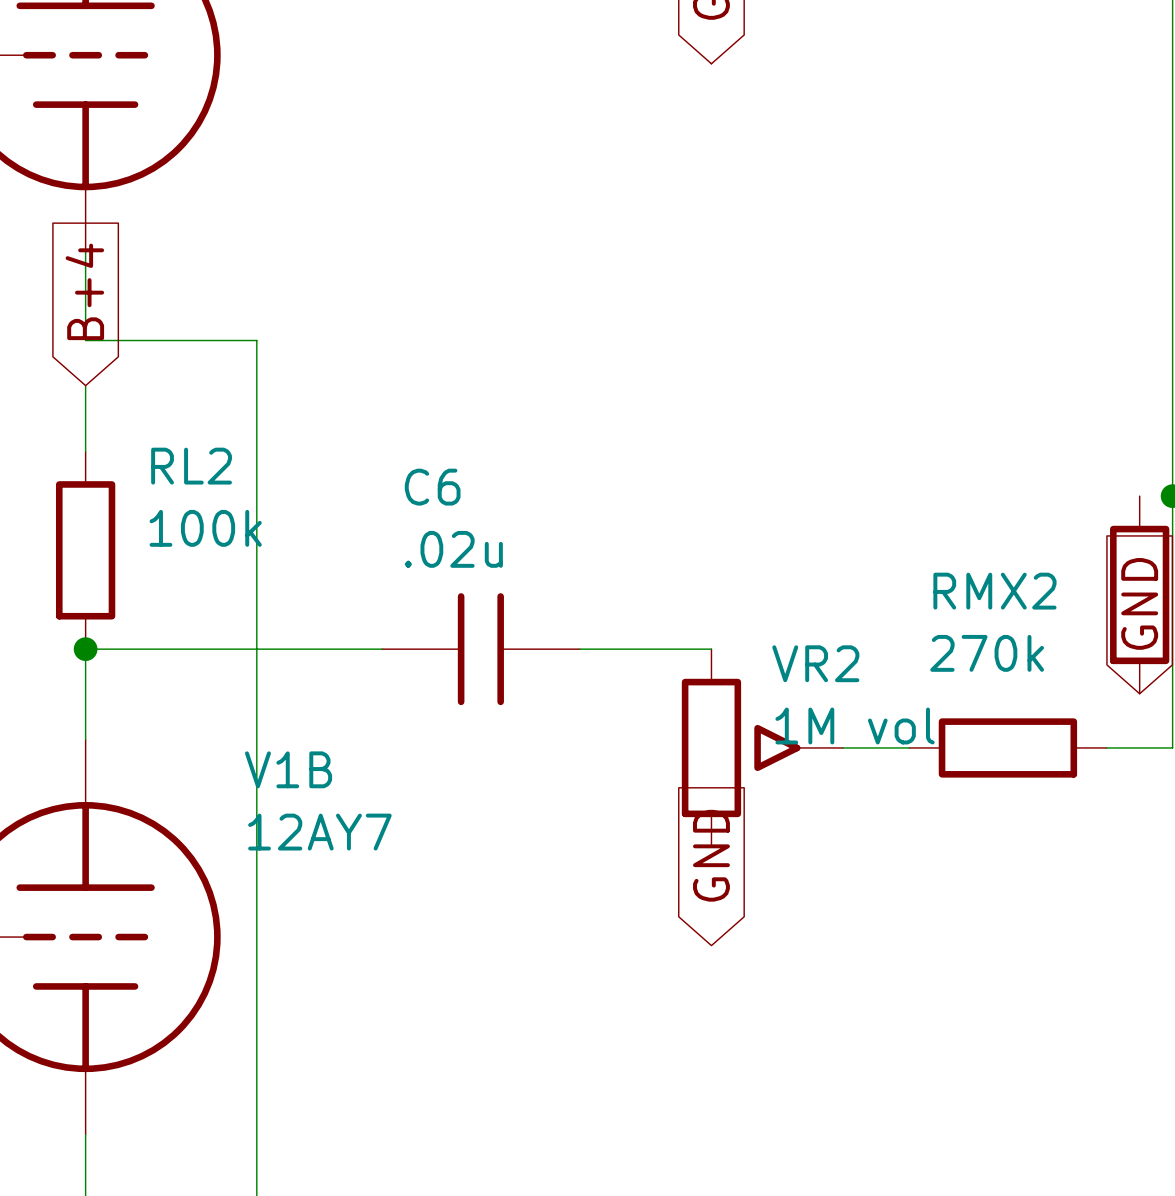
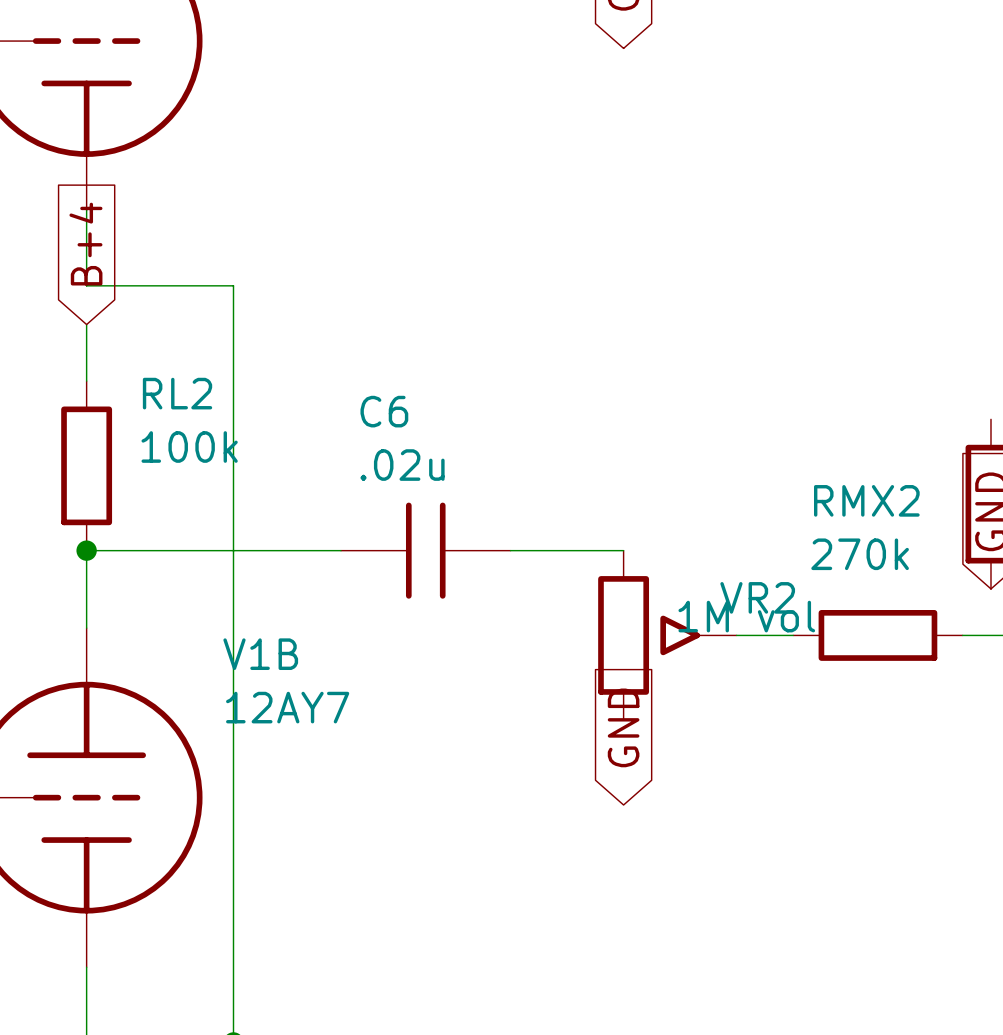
VR2 name position: VR2 (815, 663) -> VR2 (757, 597)

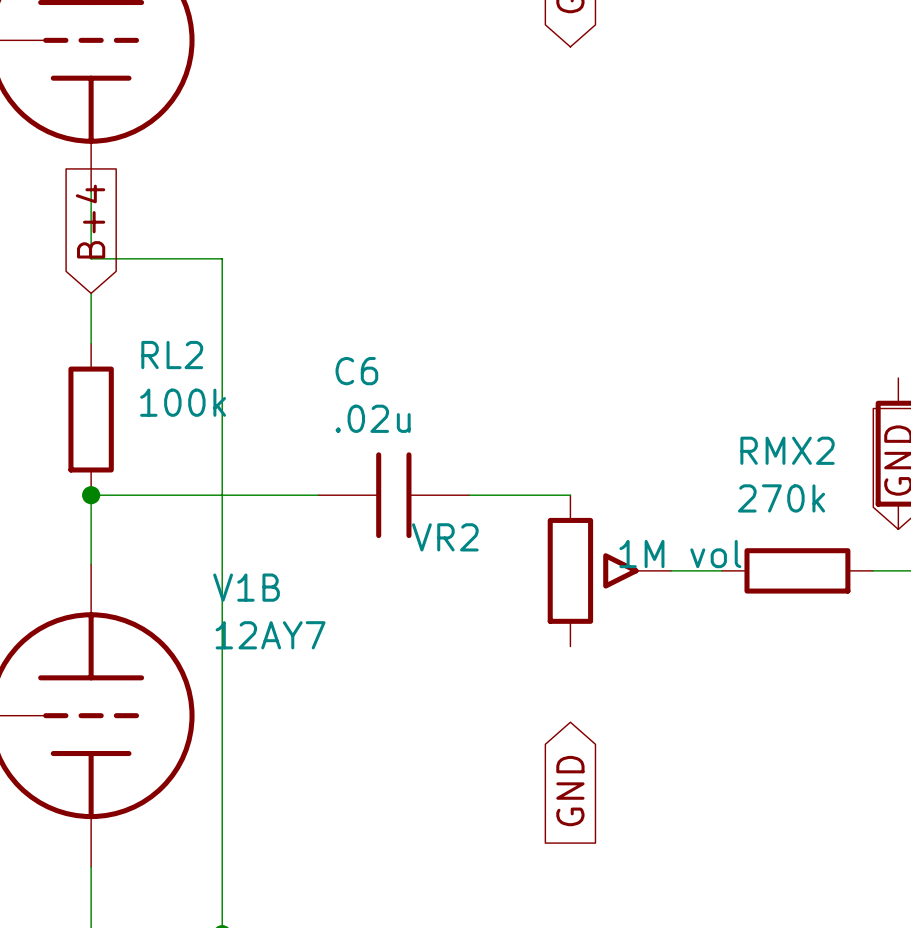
VR2 name position: VR2 (757, 597) -> VR2 (445, 537)
global label rotation: 0° (623, 727) -> 180° (570, 791)

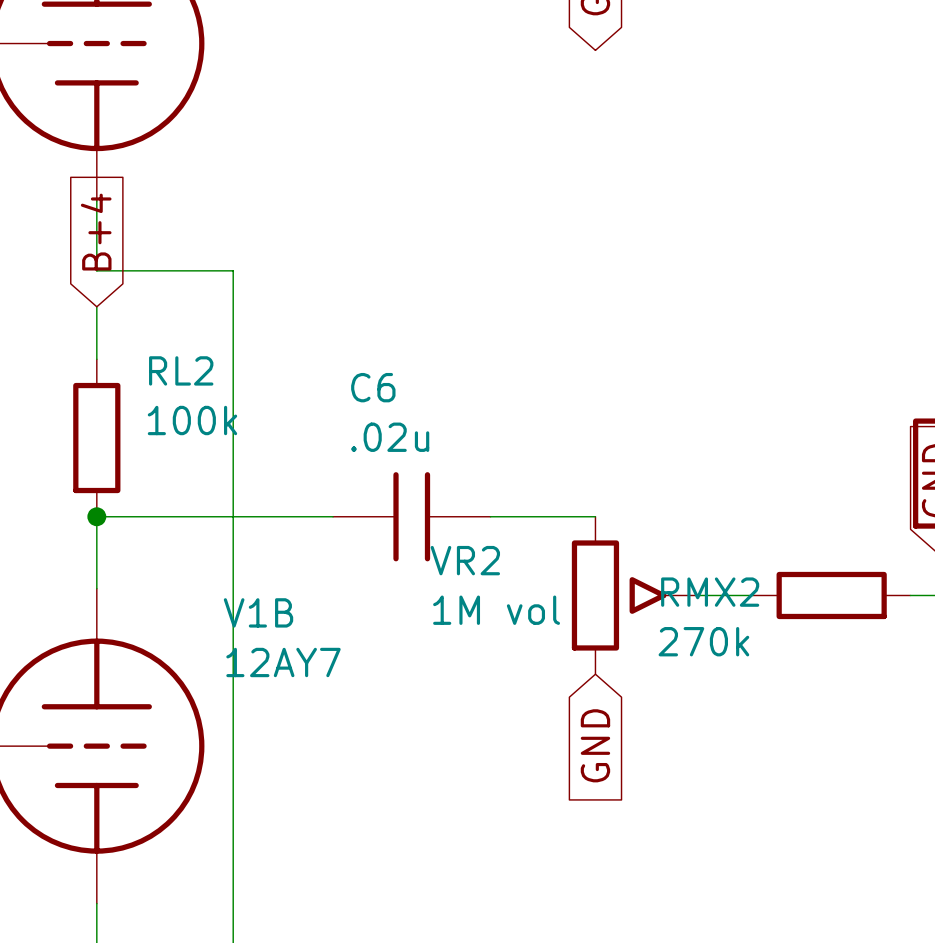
RMX2 name position: RMX2 (787, 450) -> RMX2 (710, 592)
RMX2 value position: 270k (781, 498) -> 270k (703, 641)
VR2 value position: 1M vol (680, 554) -> 1M vol (496, 610)
global label position: GND (570, 791) -> GND (595, 745)

